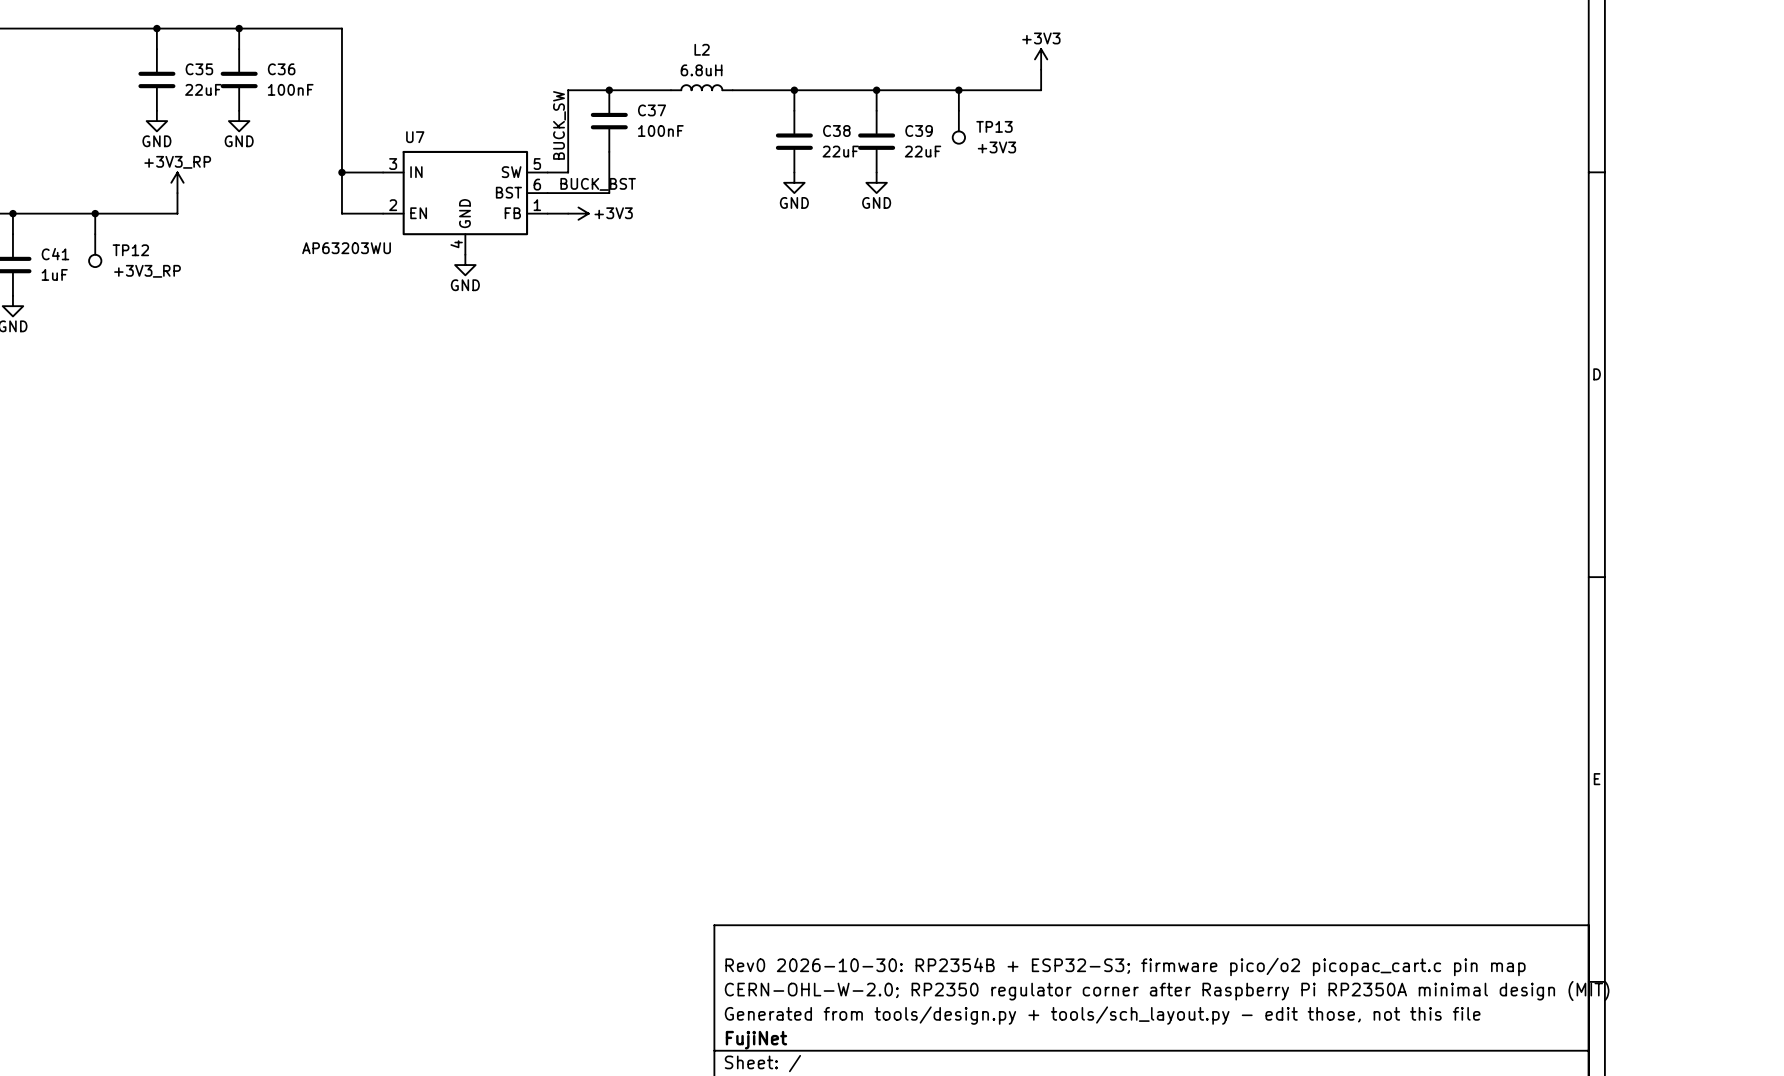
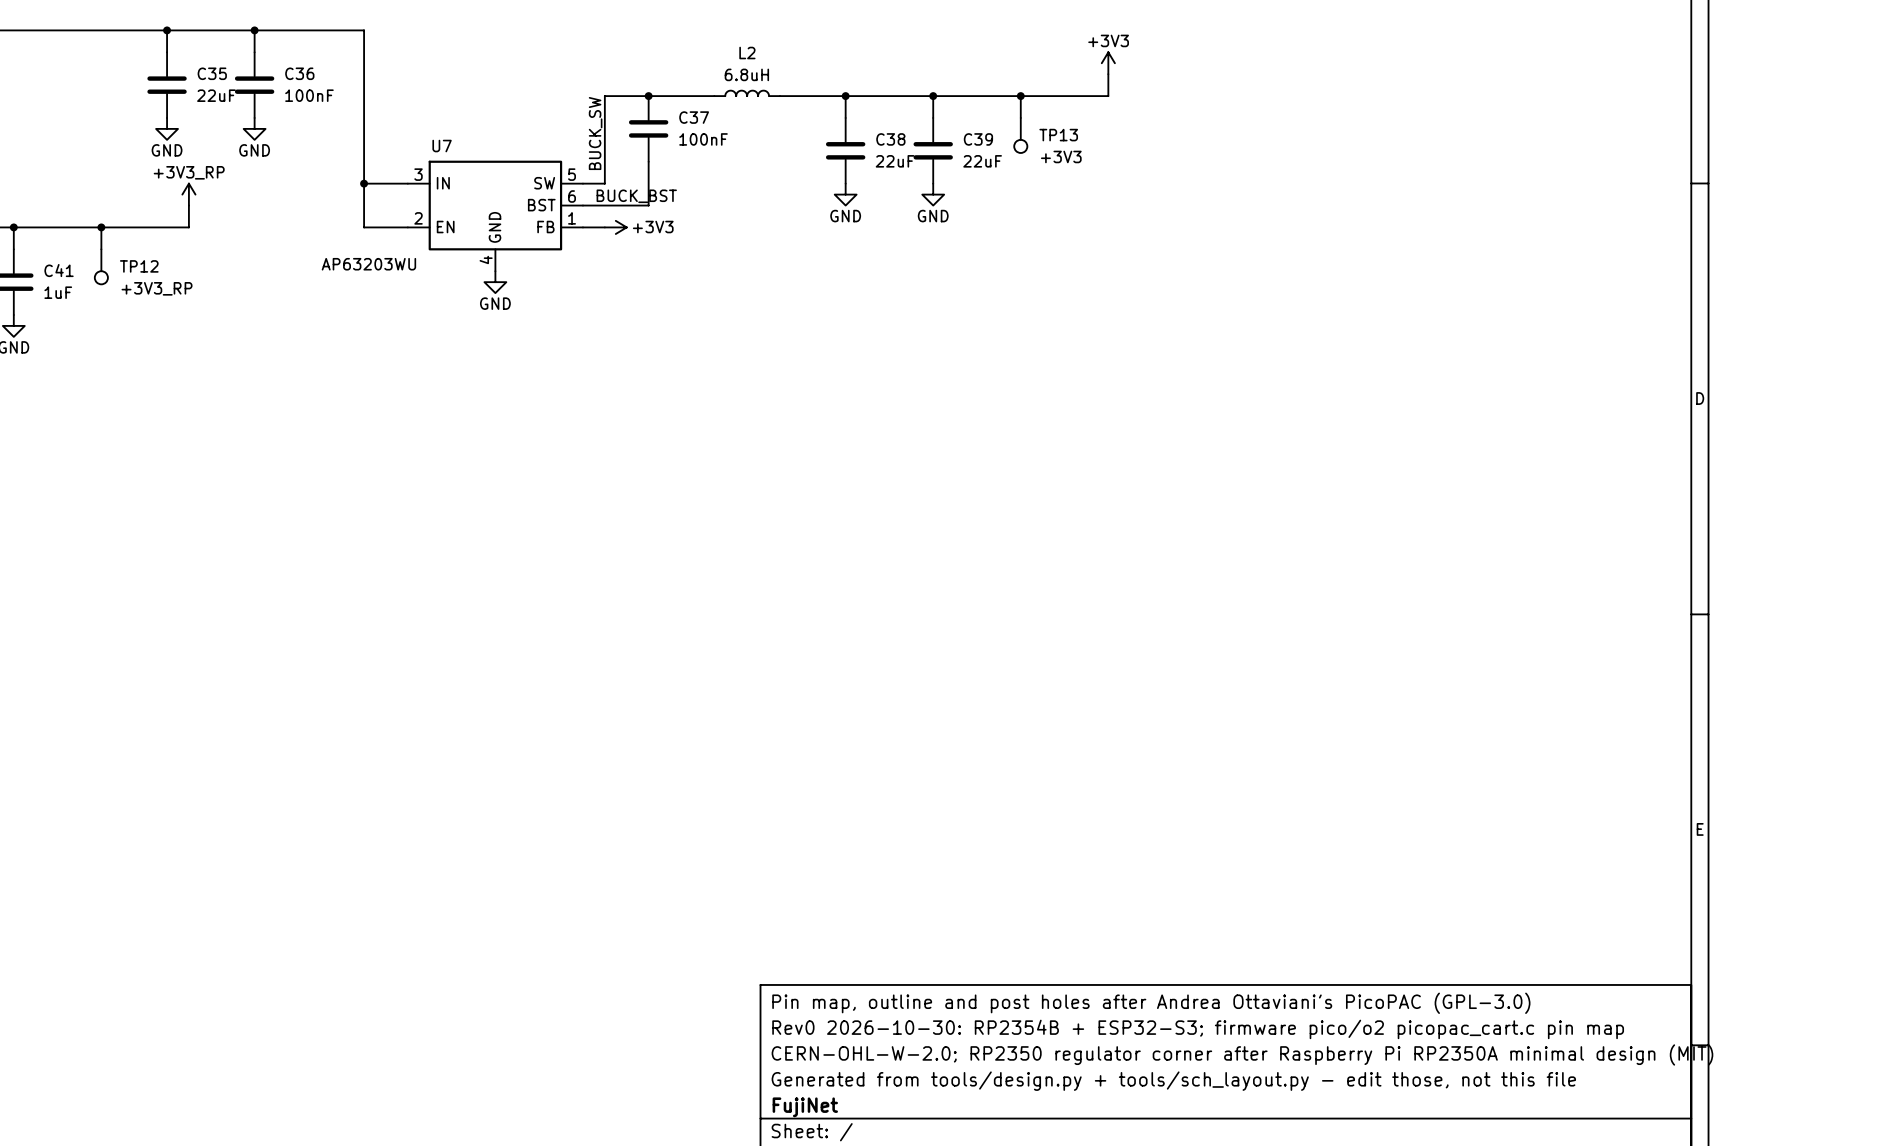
title block: none -> Pin map, outline and post holes after Andrea Ottaviani's PicoPAC (GPL-3.0) (1151, 1003)

